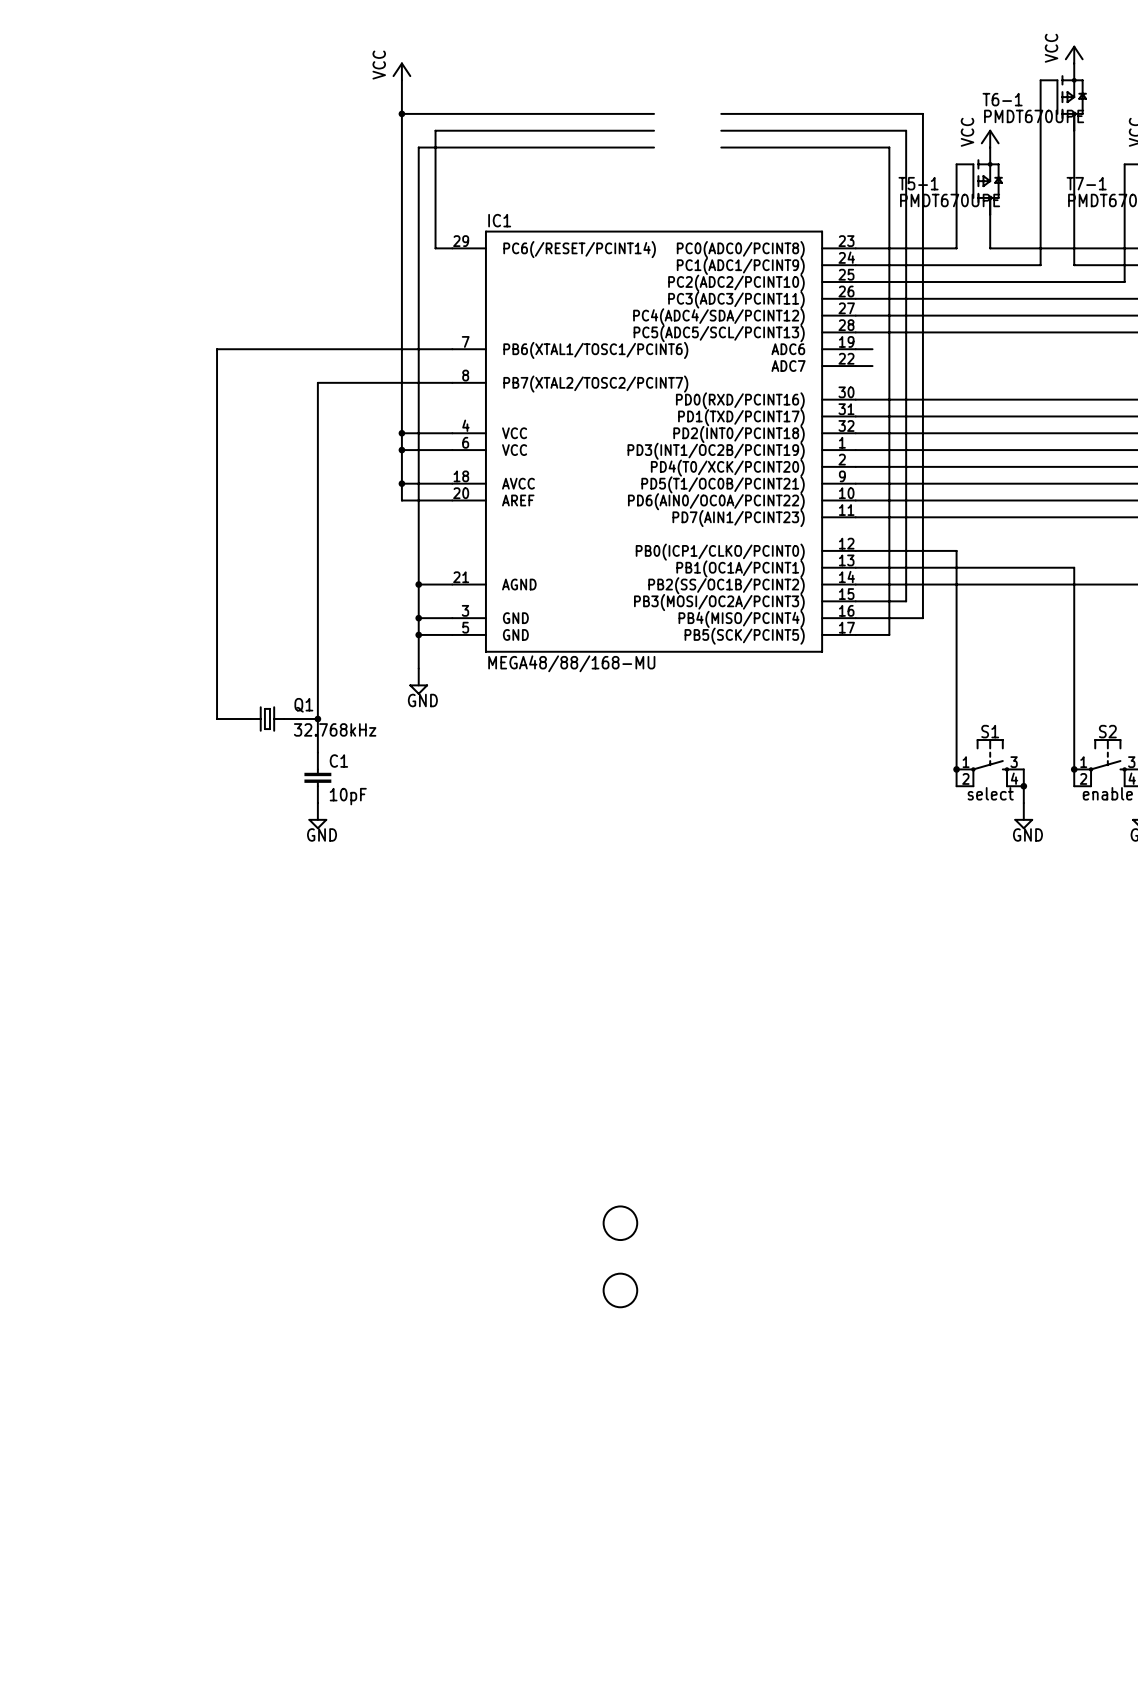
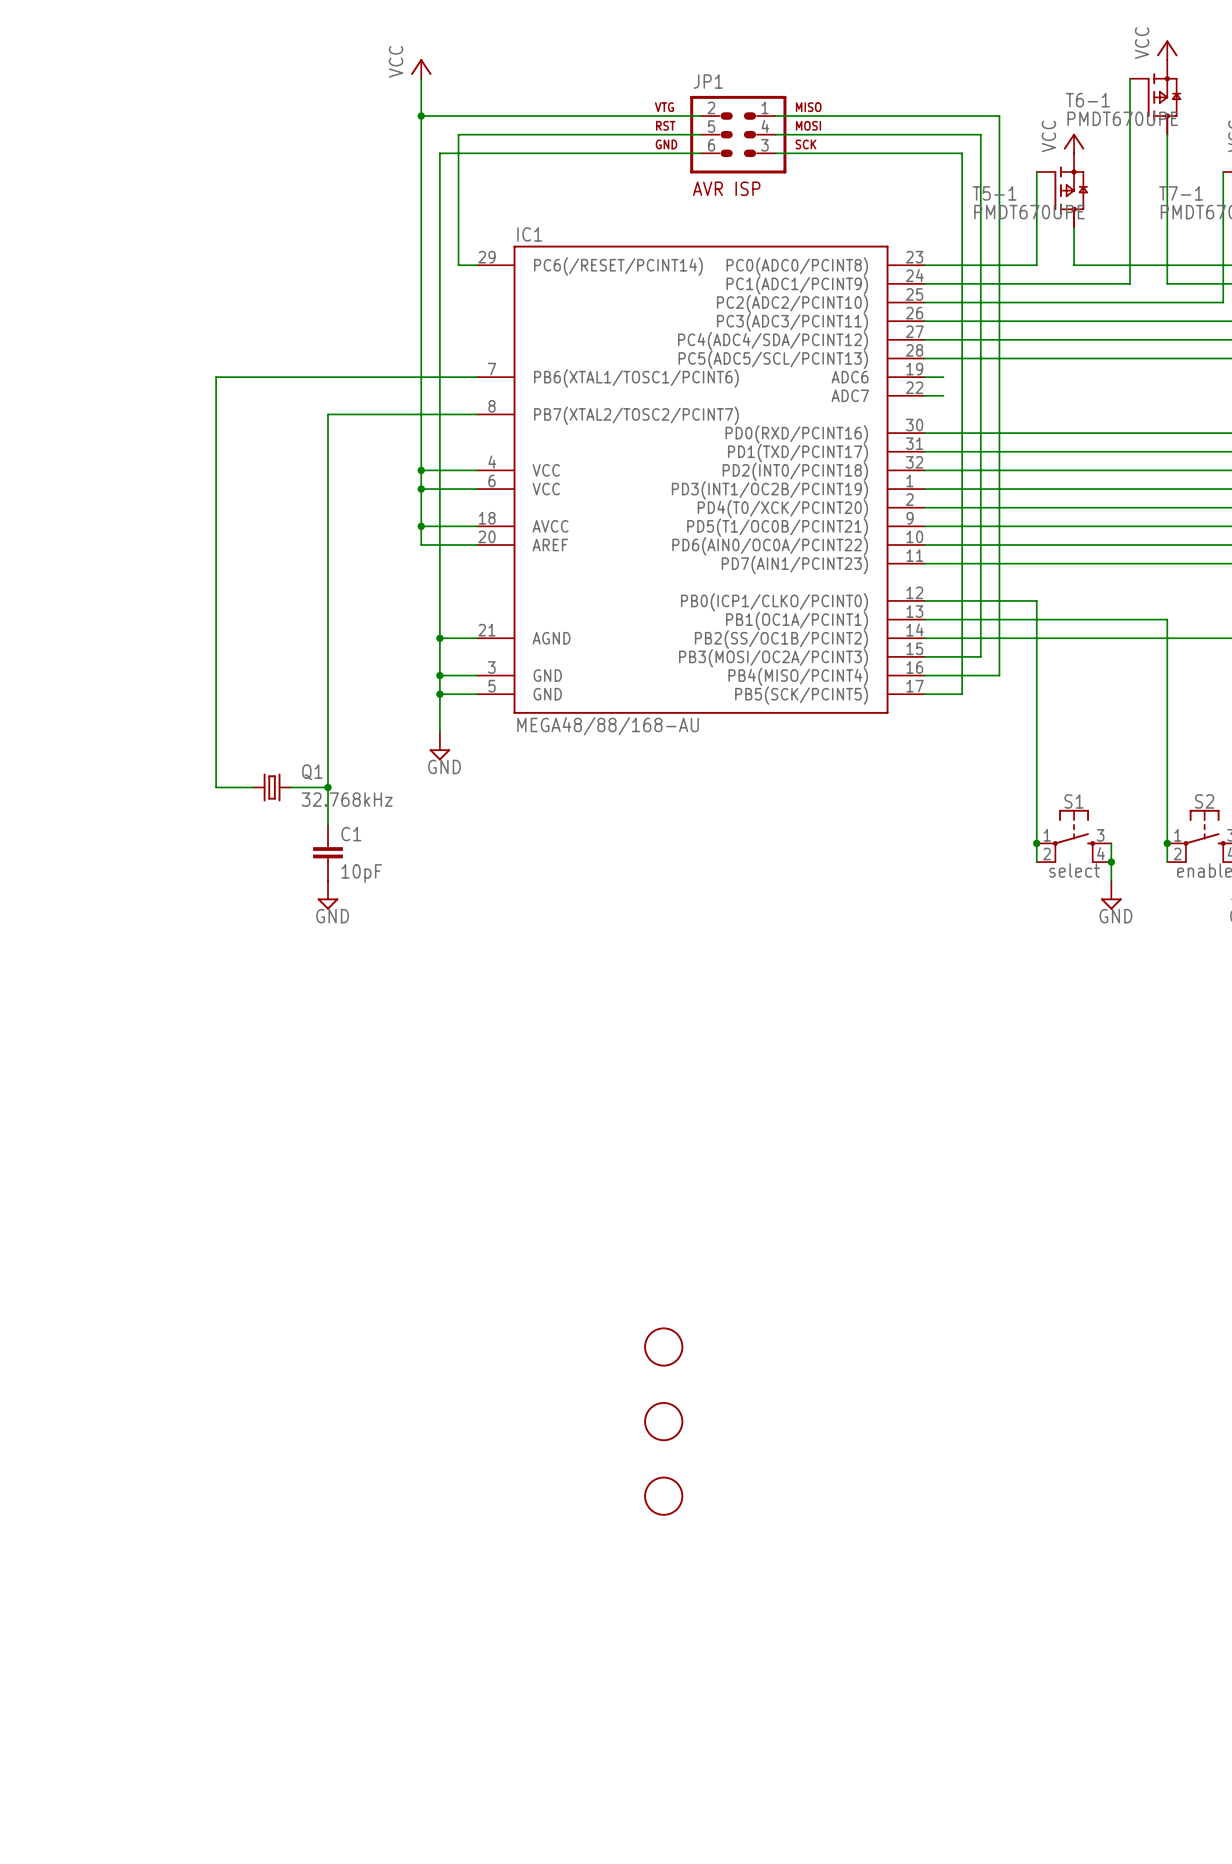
JP1: none -> (738, 134)
IC1 value: MEGA48/88/168-MU (571, 663) -> MEGA48/88/168-AU (608, 726)
part: none -> (663, 1496)

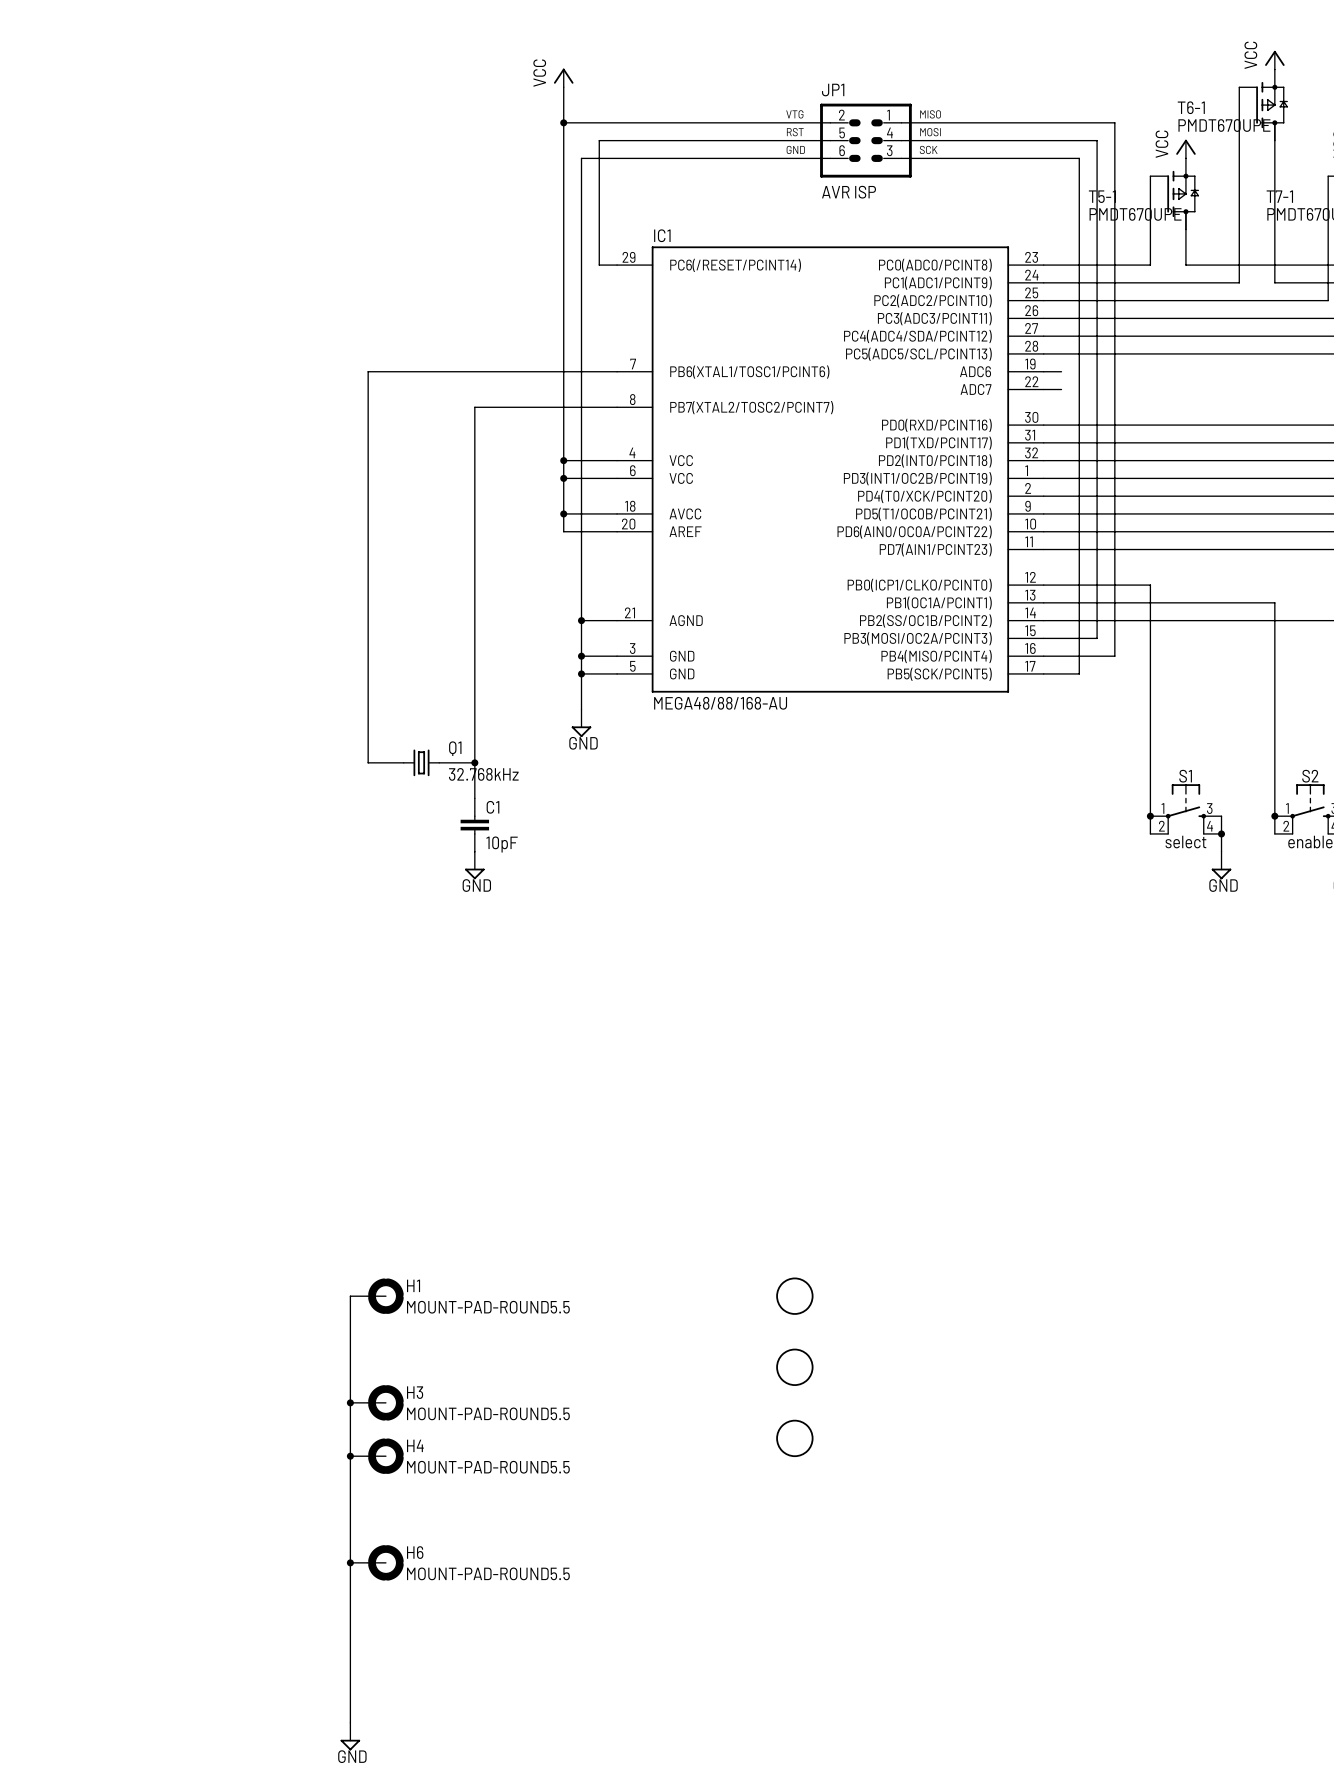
wire: none -> (368, 1296) (350, 1296) (350, 1722)
H1: none -> MOUNT-PAD-ROUND5.5 (385, 1296)
wire: none -> (350, 1402) (368, 1402)
junction: none -> (350, 1402)
H3: none -> MOUNT-PAD-ROUND5.5 (385, 1402)
wire: none -> (350, 1456) (368, 1456)
junction: none -> (350, 1456)
H4: none -> MOUNT-PAD-ROUND5.5 (385, 1456)
wire: none -> (350, 1562) (368, 1562)
junction: none -> (350, 1562)
H6: none -> MOUNT-PAD-ROUND5.5 (385, 1562)
power symbol: none -> GND (350, 1736)

